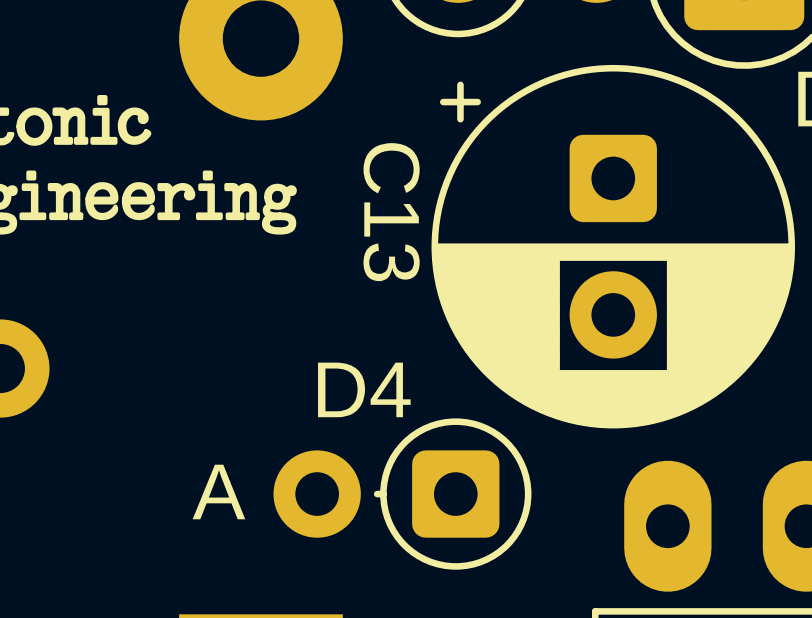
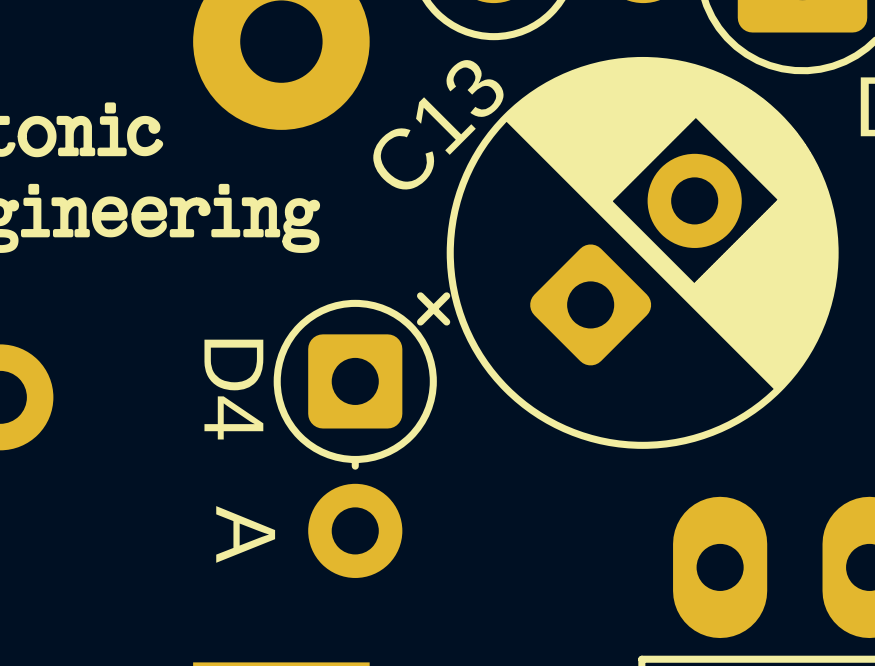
C13 footprint: [431, 64, 796, 429] -> [416, 56, 839, 449]
D4 footprint: [273, 418, 532, 570] -> [273, 299, 437, 578]

